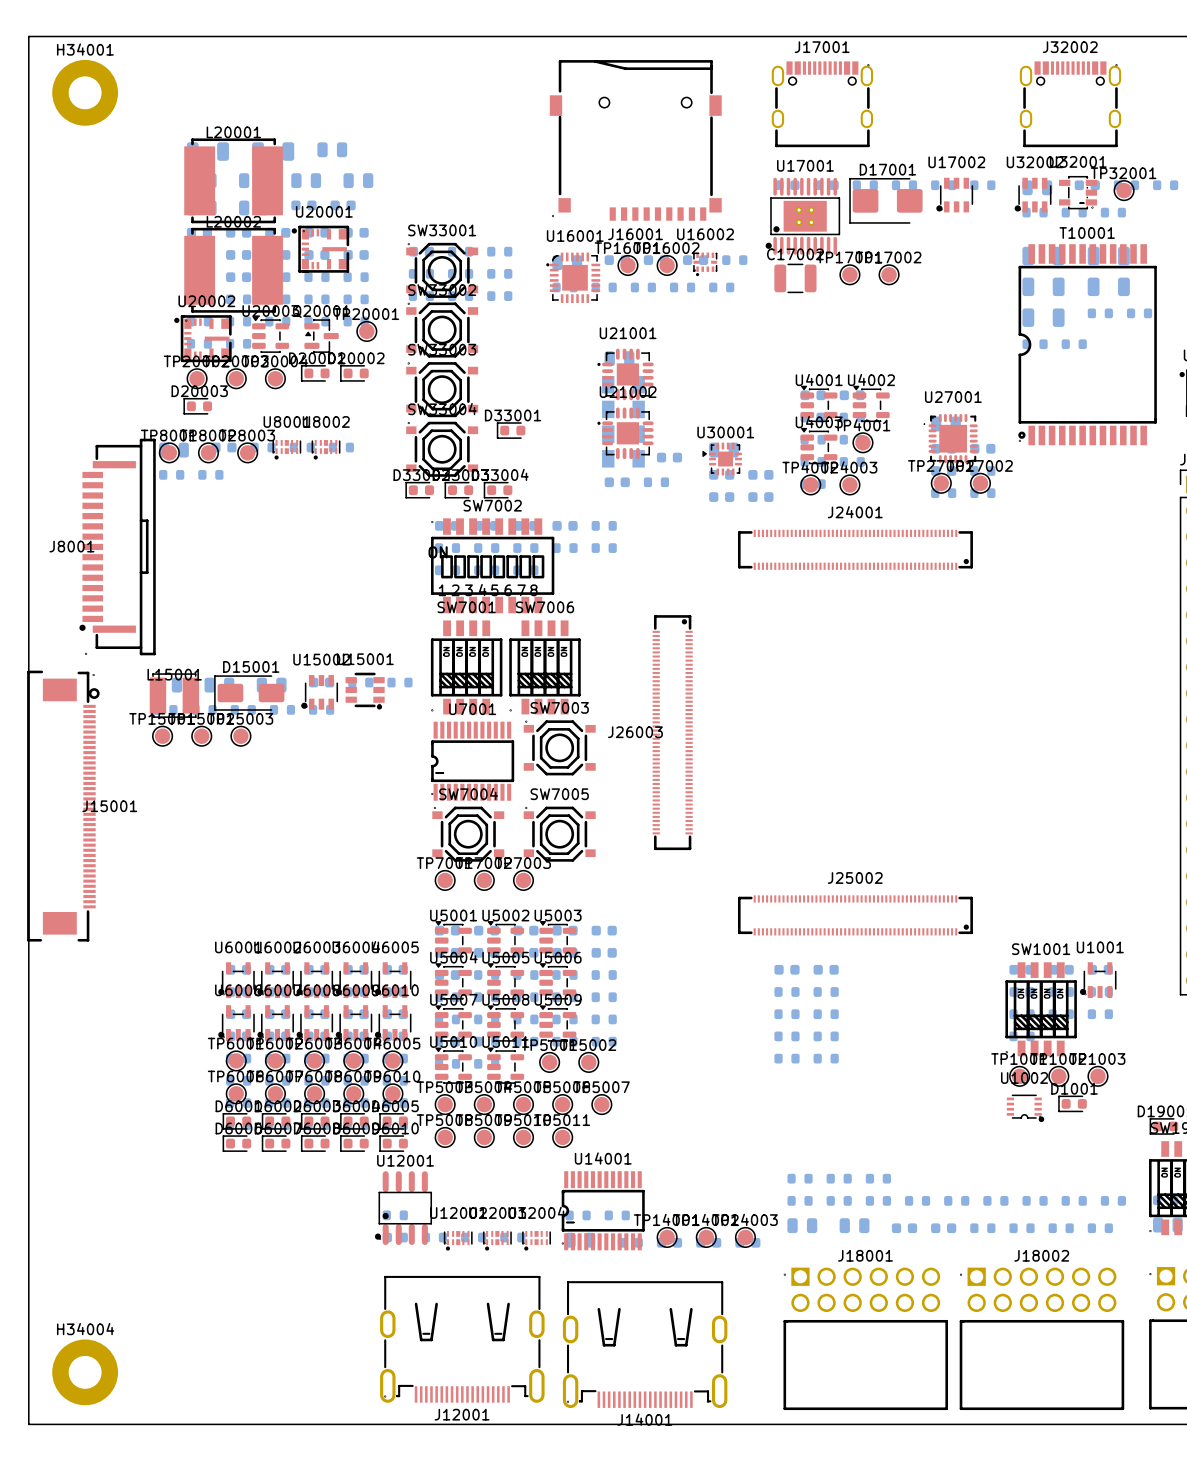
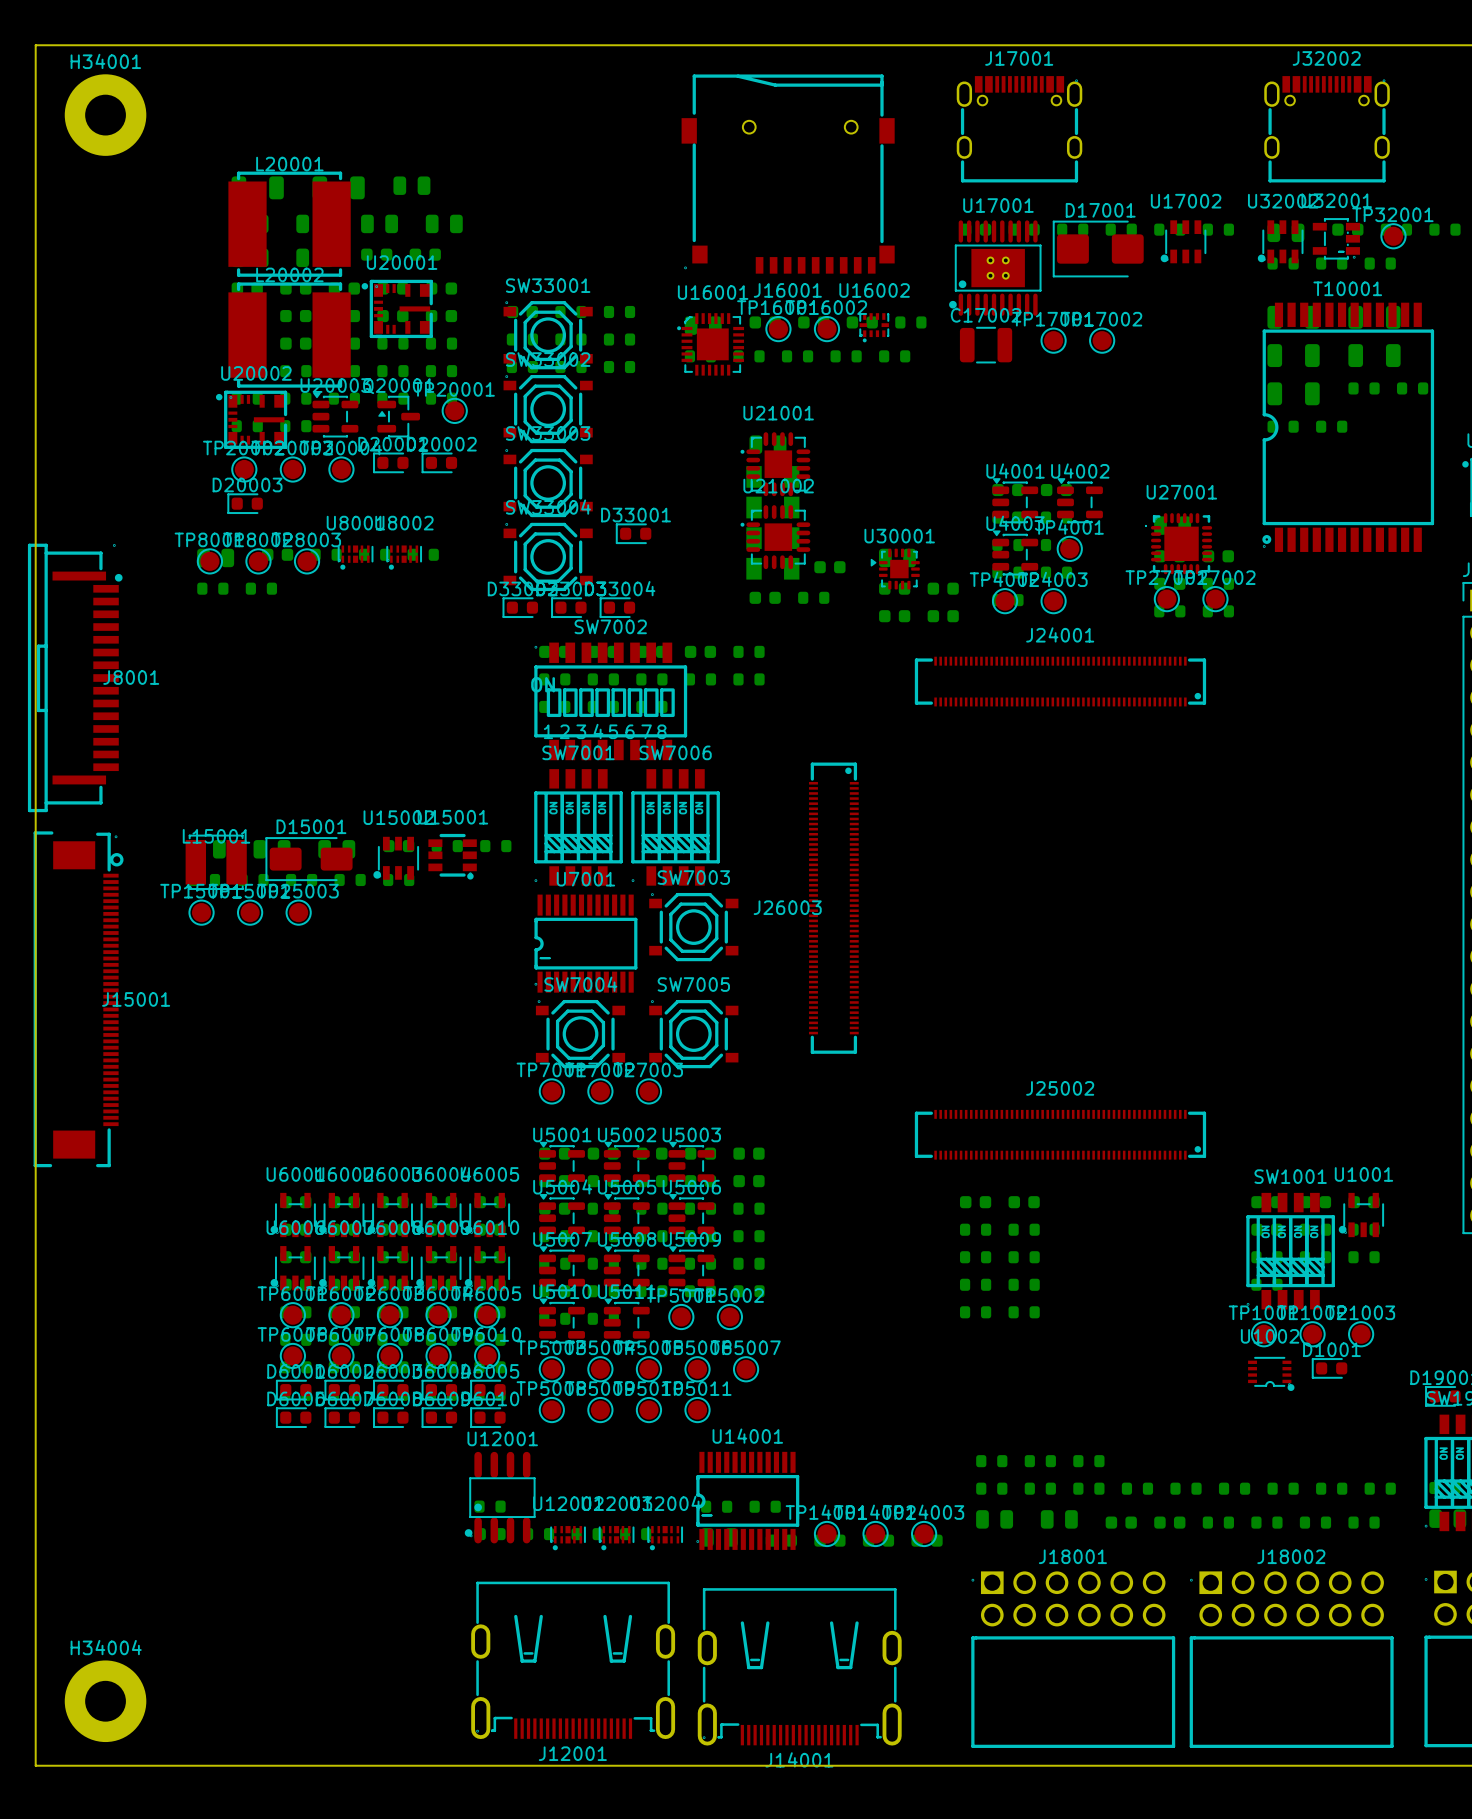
J8001 rotation: 0° (117, 547) -> 180° (75, 677)

